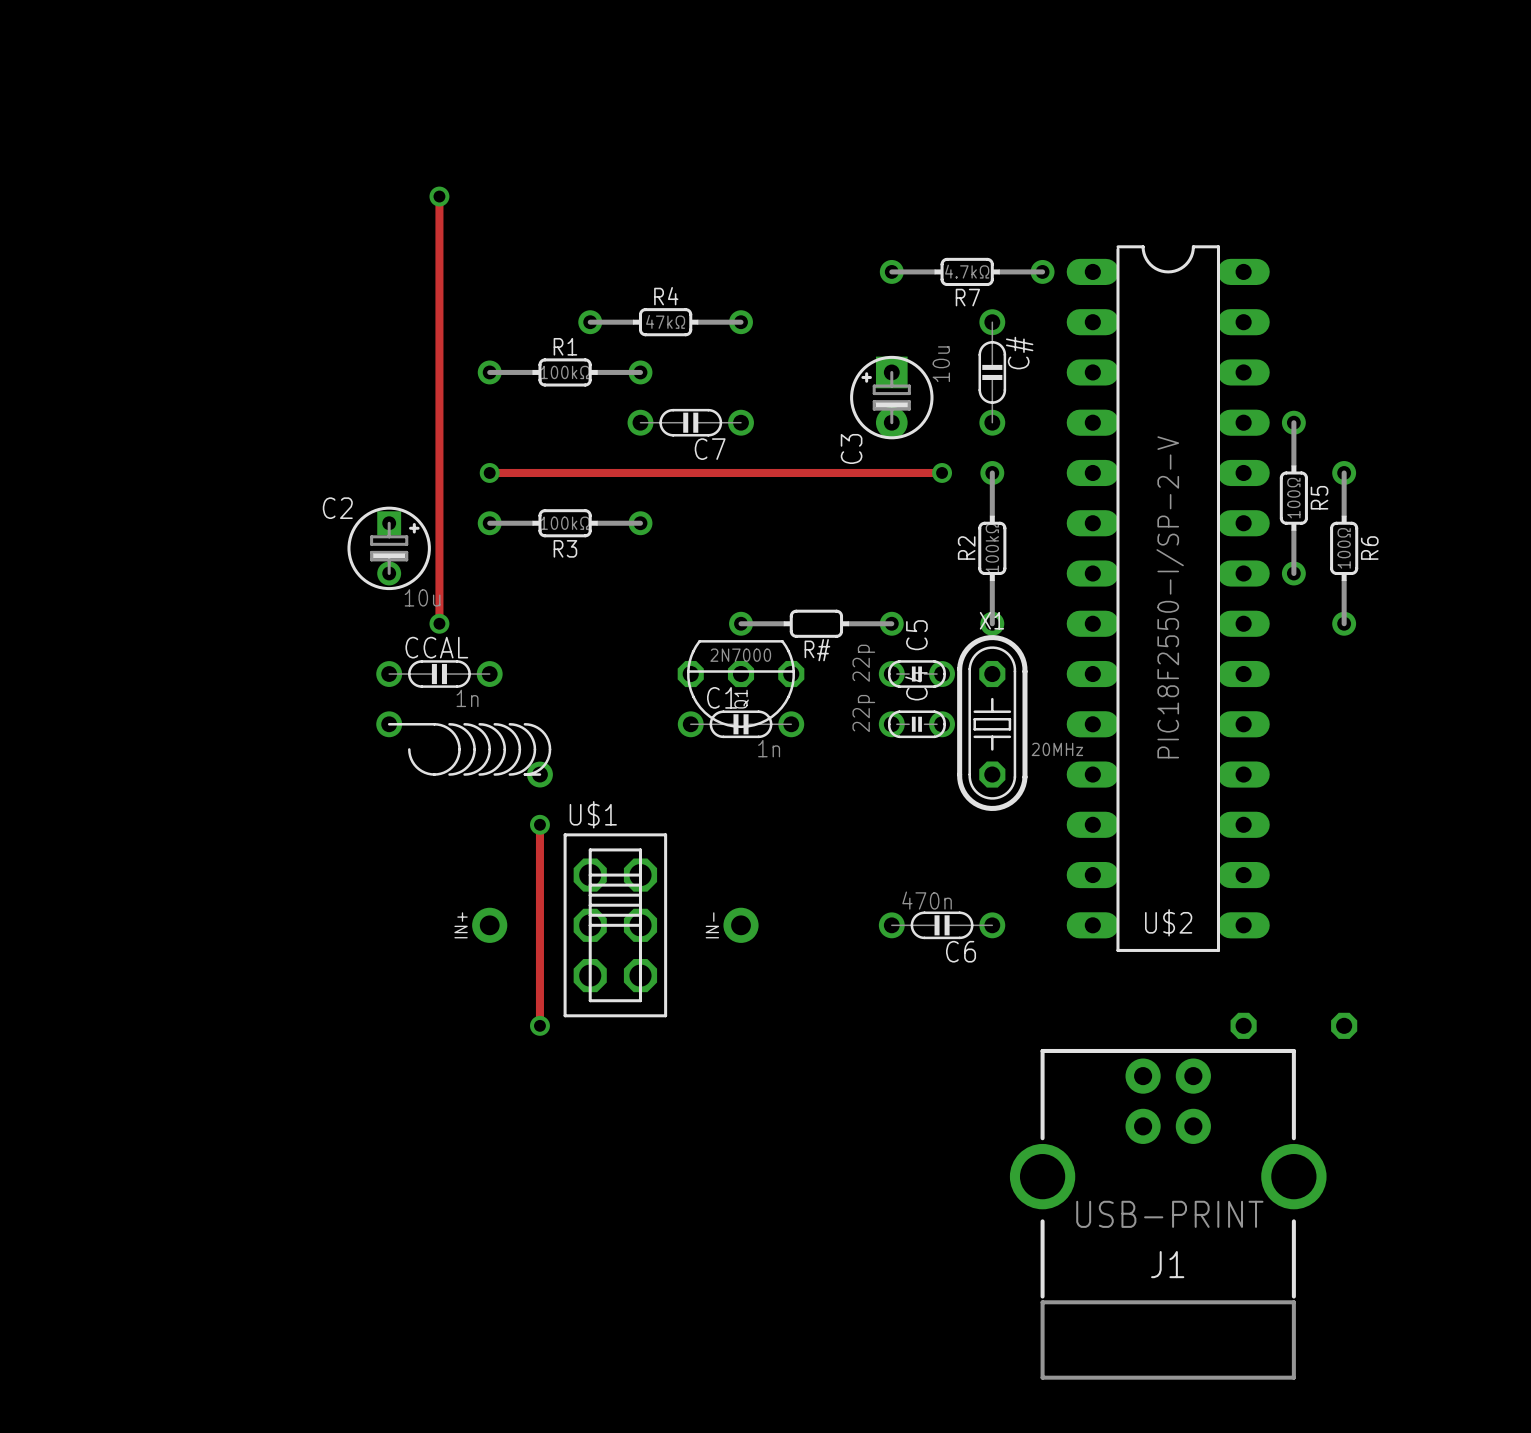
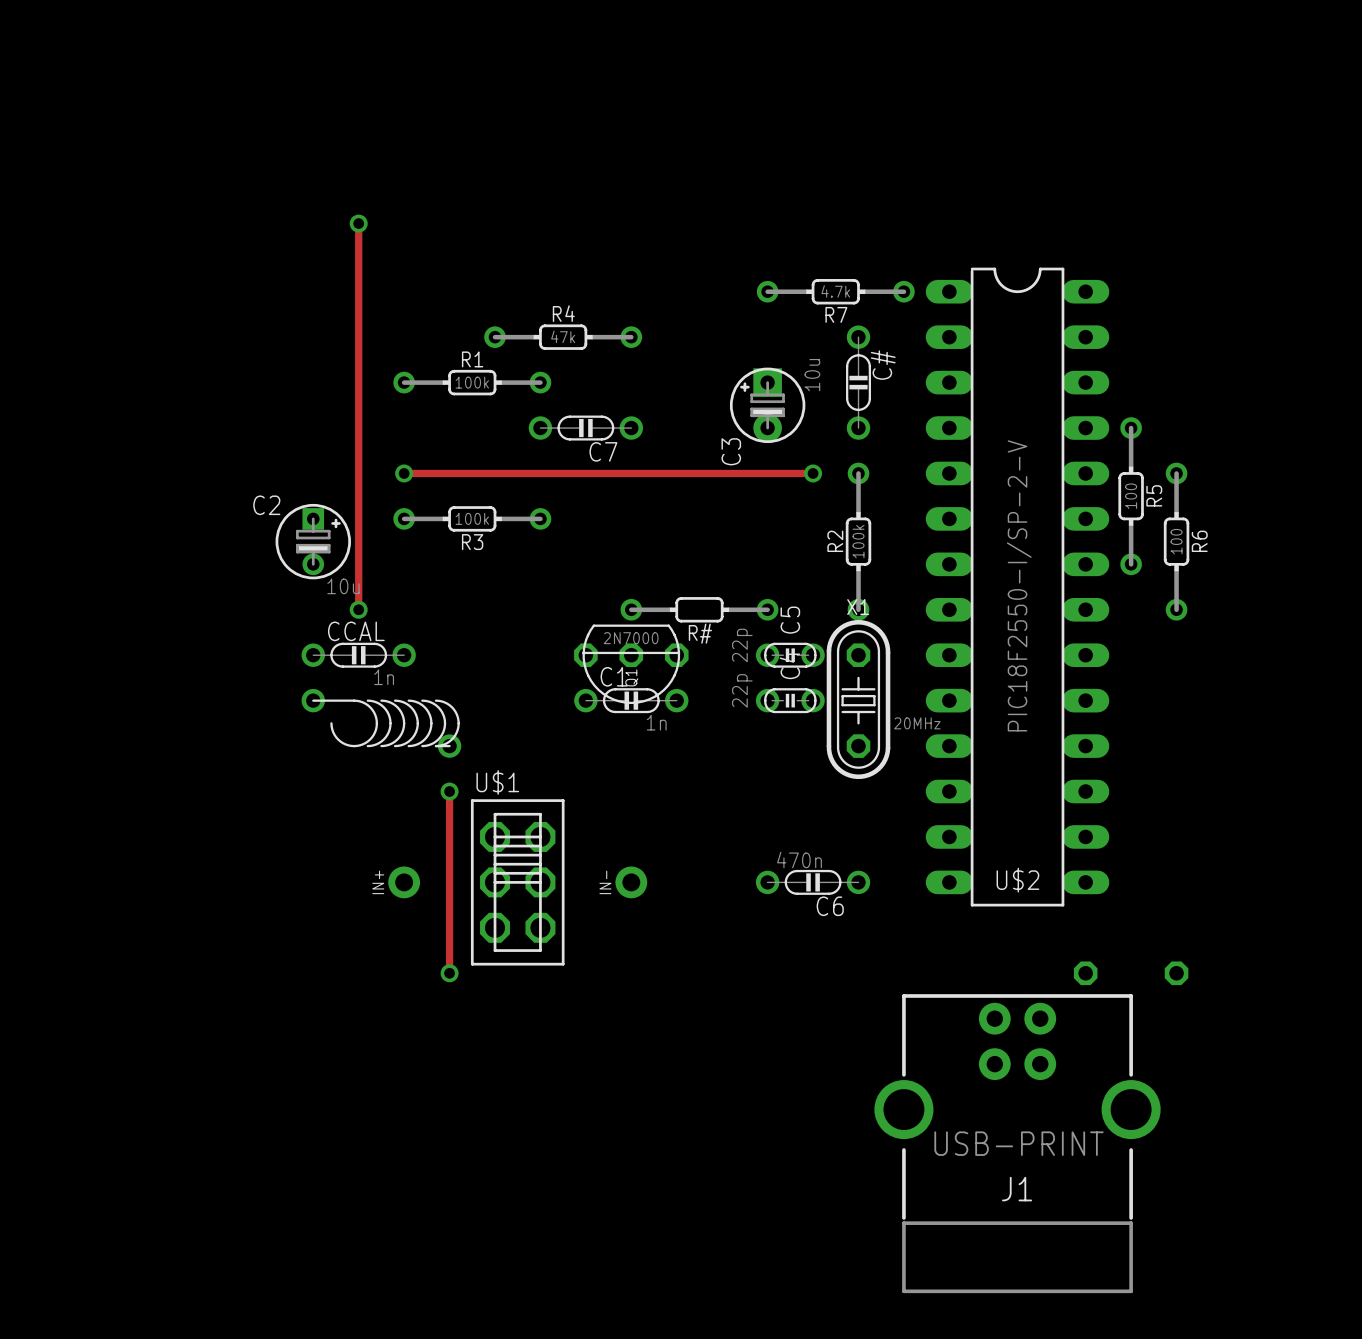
R7 value: 4.7kΩ (967, 271) -> 4.7k (835, 291)
R4 value: 47kΩ (665, 321) -> 47k (563, 336)
R1 value: 100kΩ (565, 372) -> 100k (472, 382)
R5 value: 100Ω (1293, 498) -> 100 (1131, 496)
R3 value: 100kΩ (565, 523) -> 100k (472, 518)
R2 value: 100kΩ (992, 548) -> 100k (858, 541)
R6 value: 100Ω (1344, 548) -> 100 (1176, 541)

